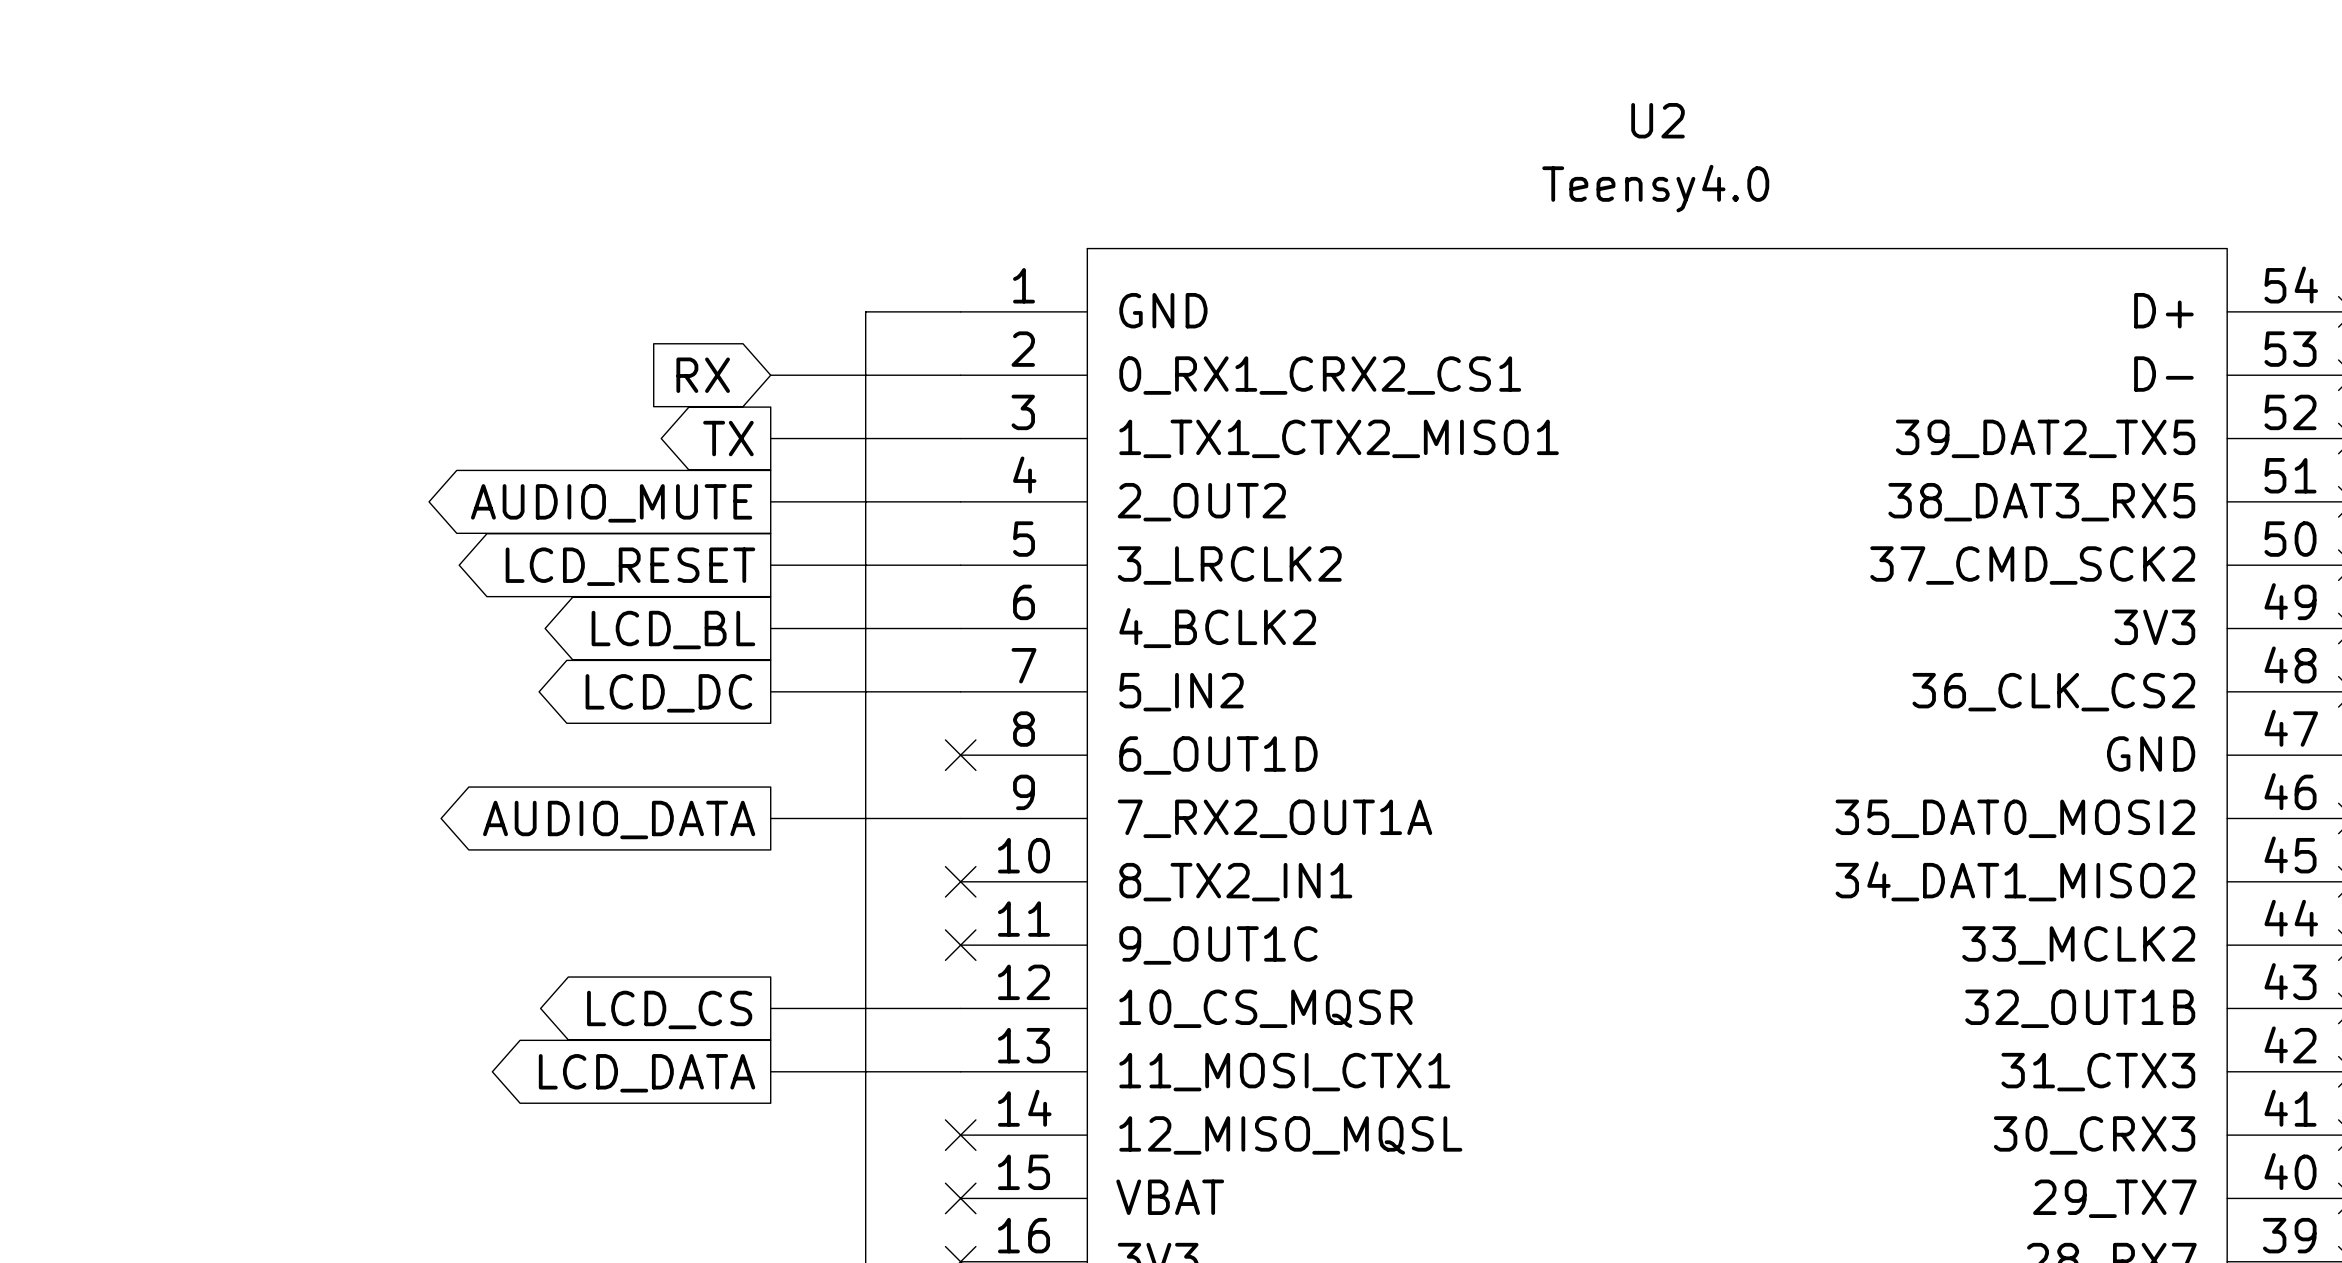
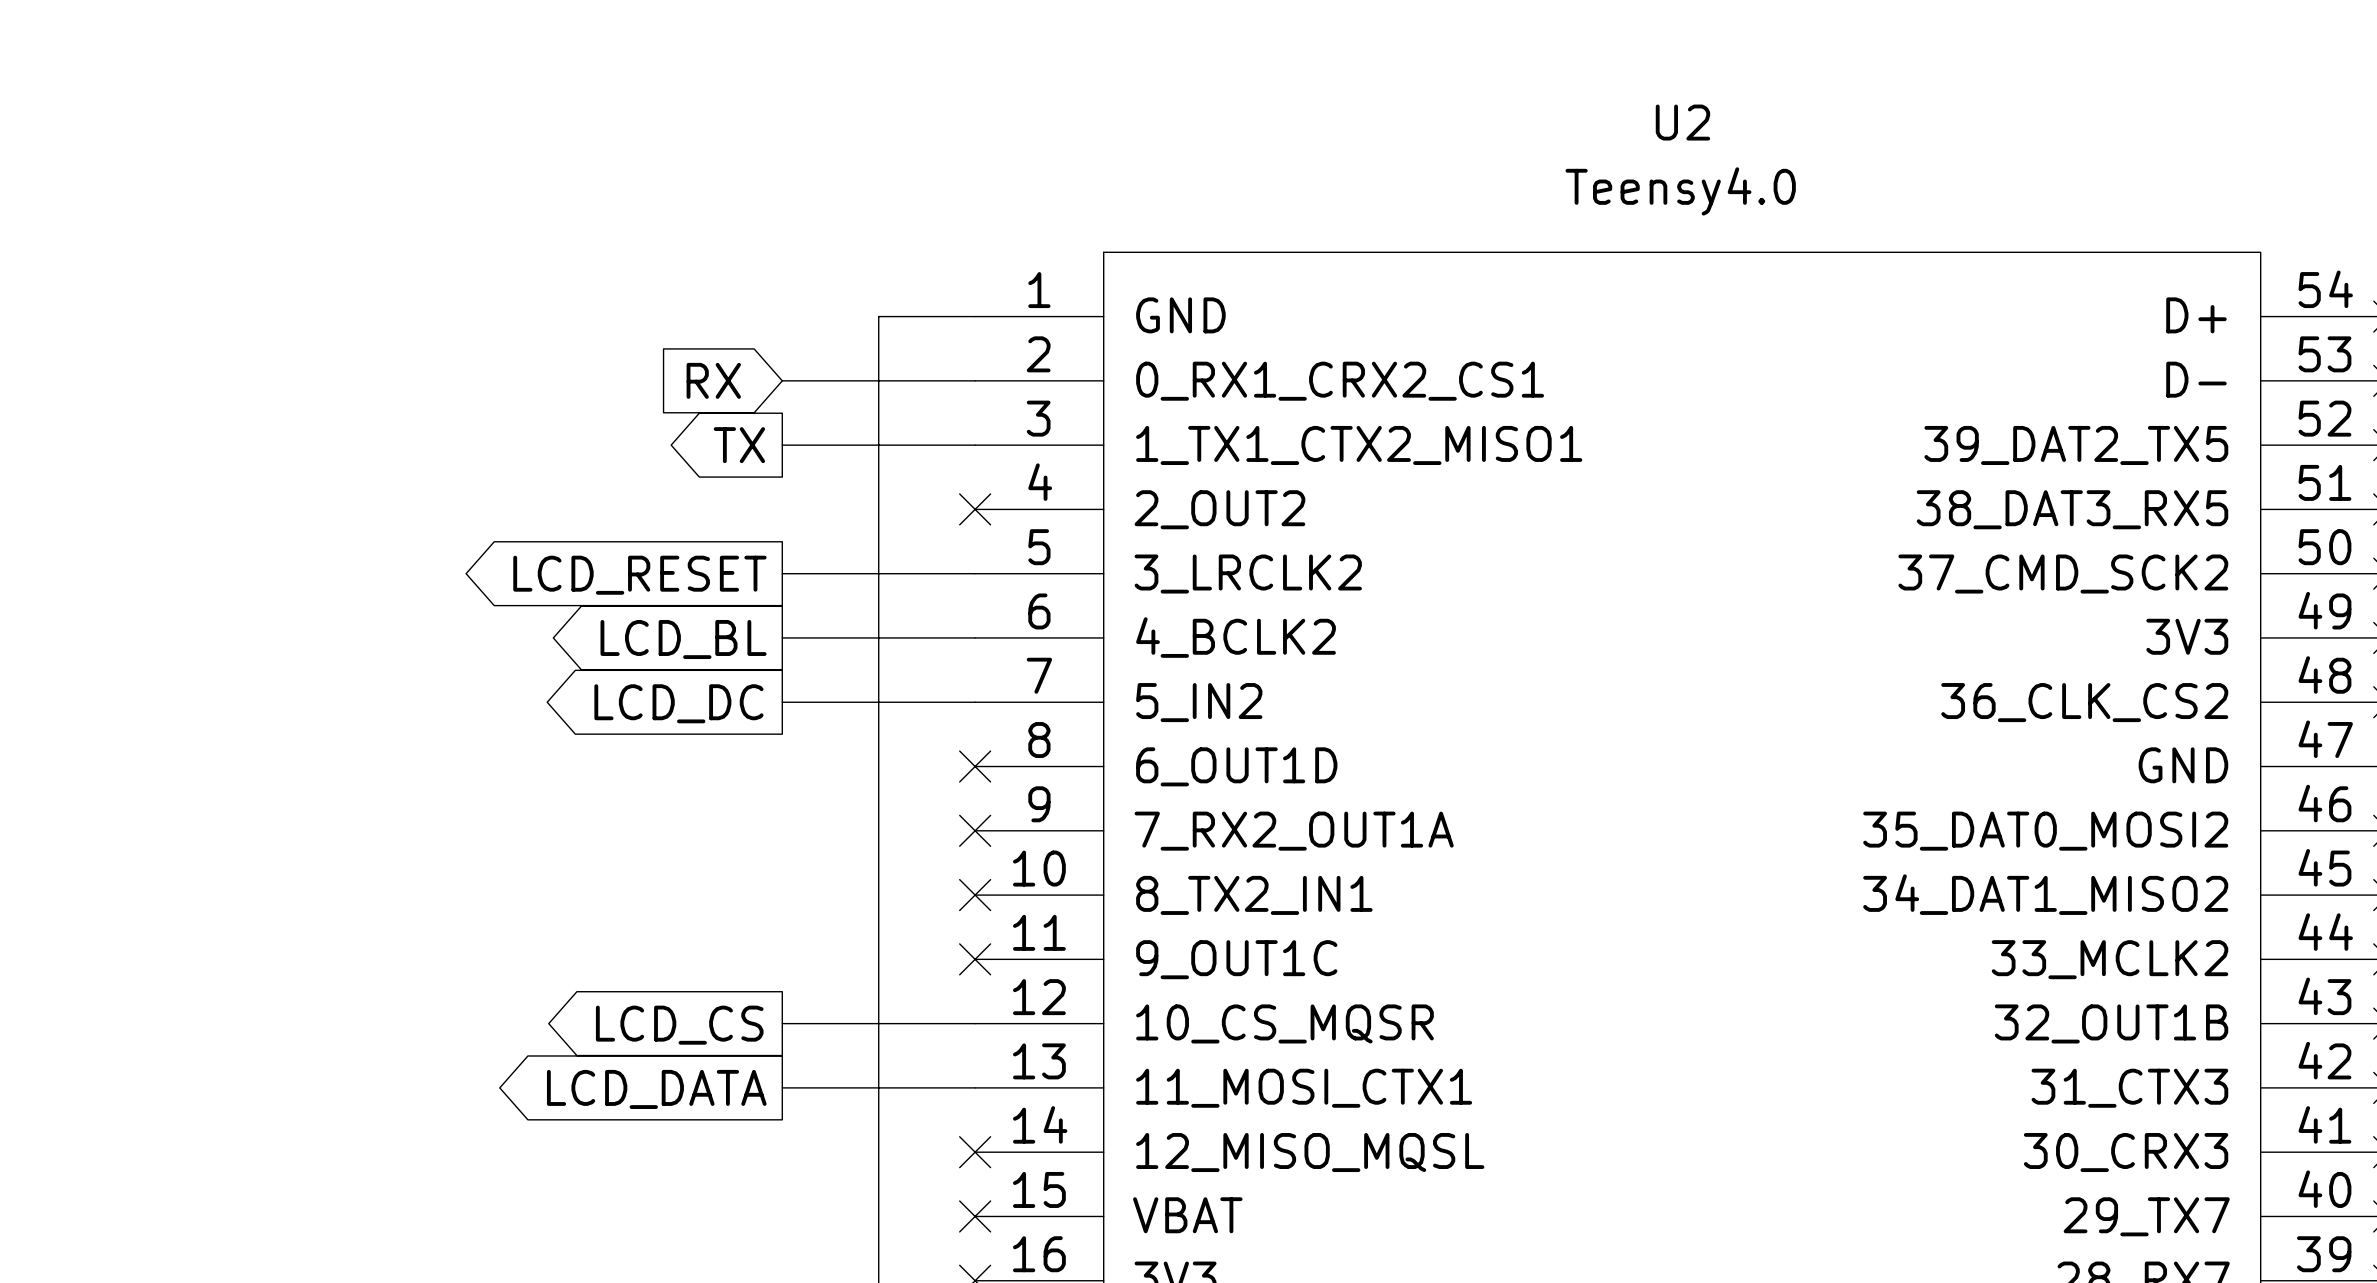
wire: (770, 501) (960, 501) -> none
no-connect mark: none -> (975, 509)
global label: AUDIO_MUTE (611, 503) -> none
wire: (770, 818) (960, 818) -> none
no-connect mark: none -> (975, 830)
global label: AUDIO_DATA (619, 819) -> none

